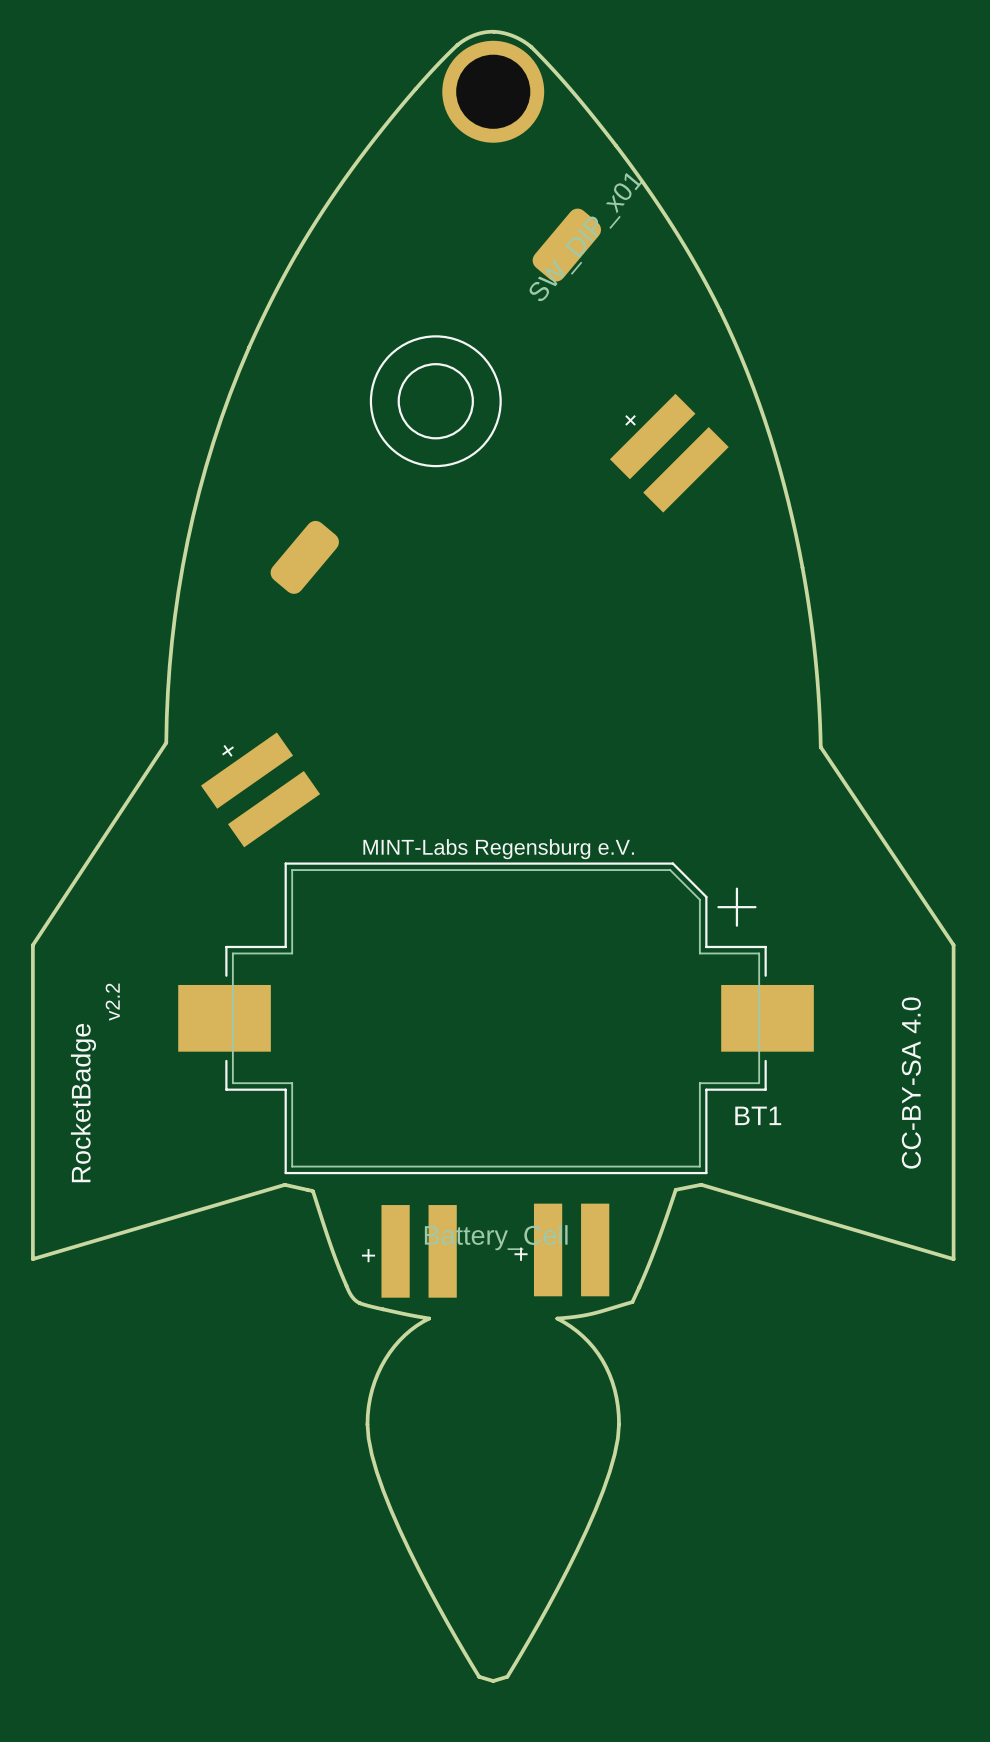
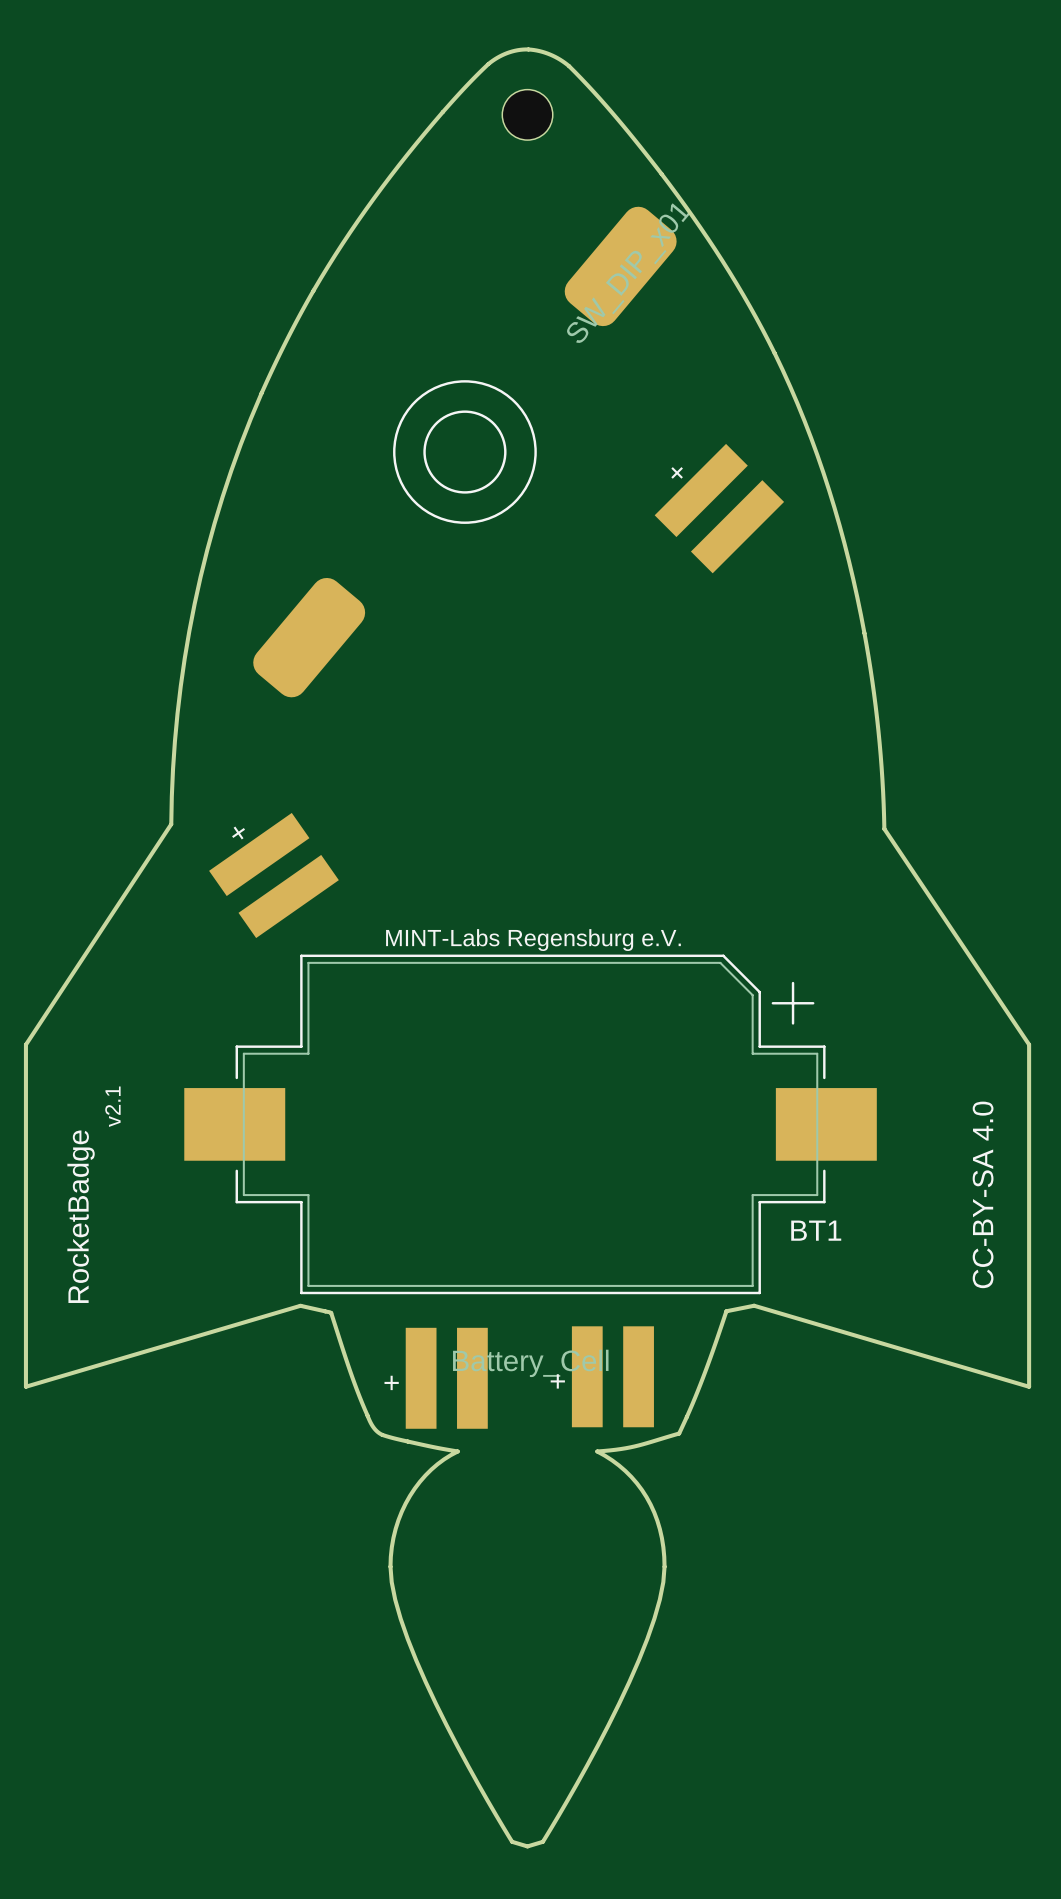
part footprint: [442, 40, 545, 143] -> [502, 89, 553, 141]
part footprint: [270, 208, 602, 594] -> [253, 206, 677, 698]
text: v2.2 (112, 1002) -> v2.1 (112, 1106)

